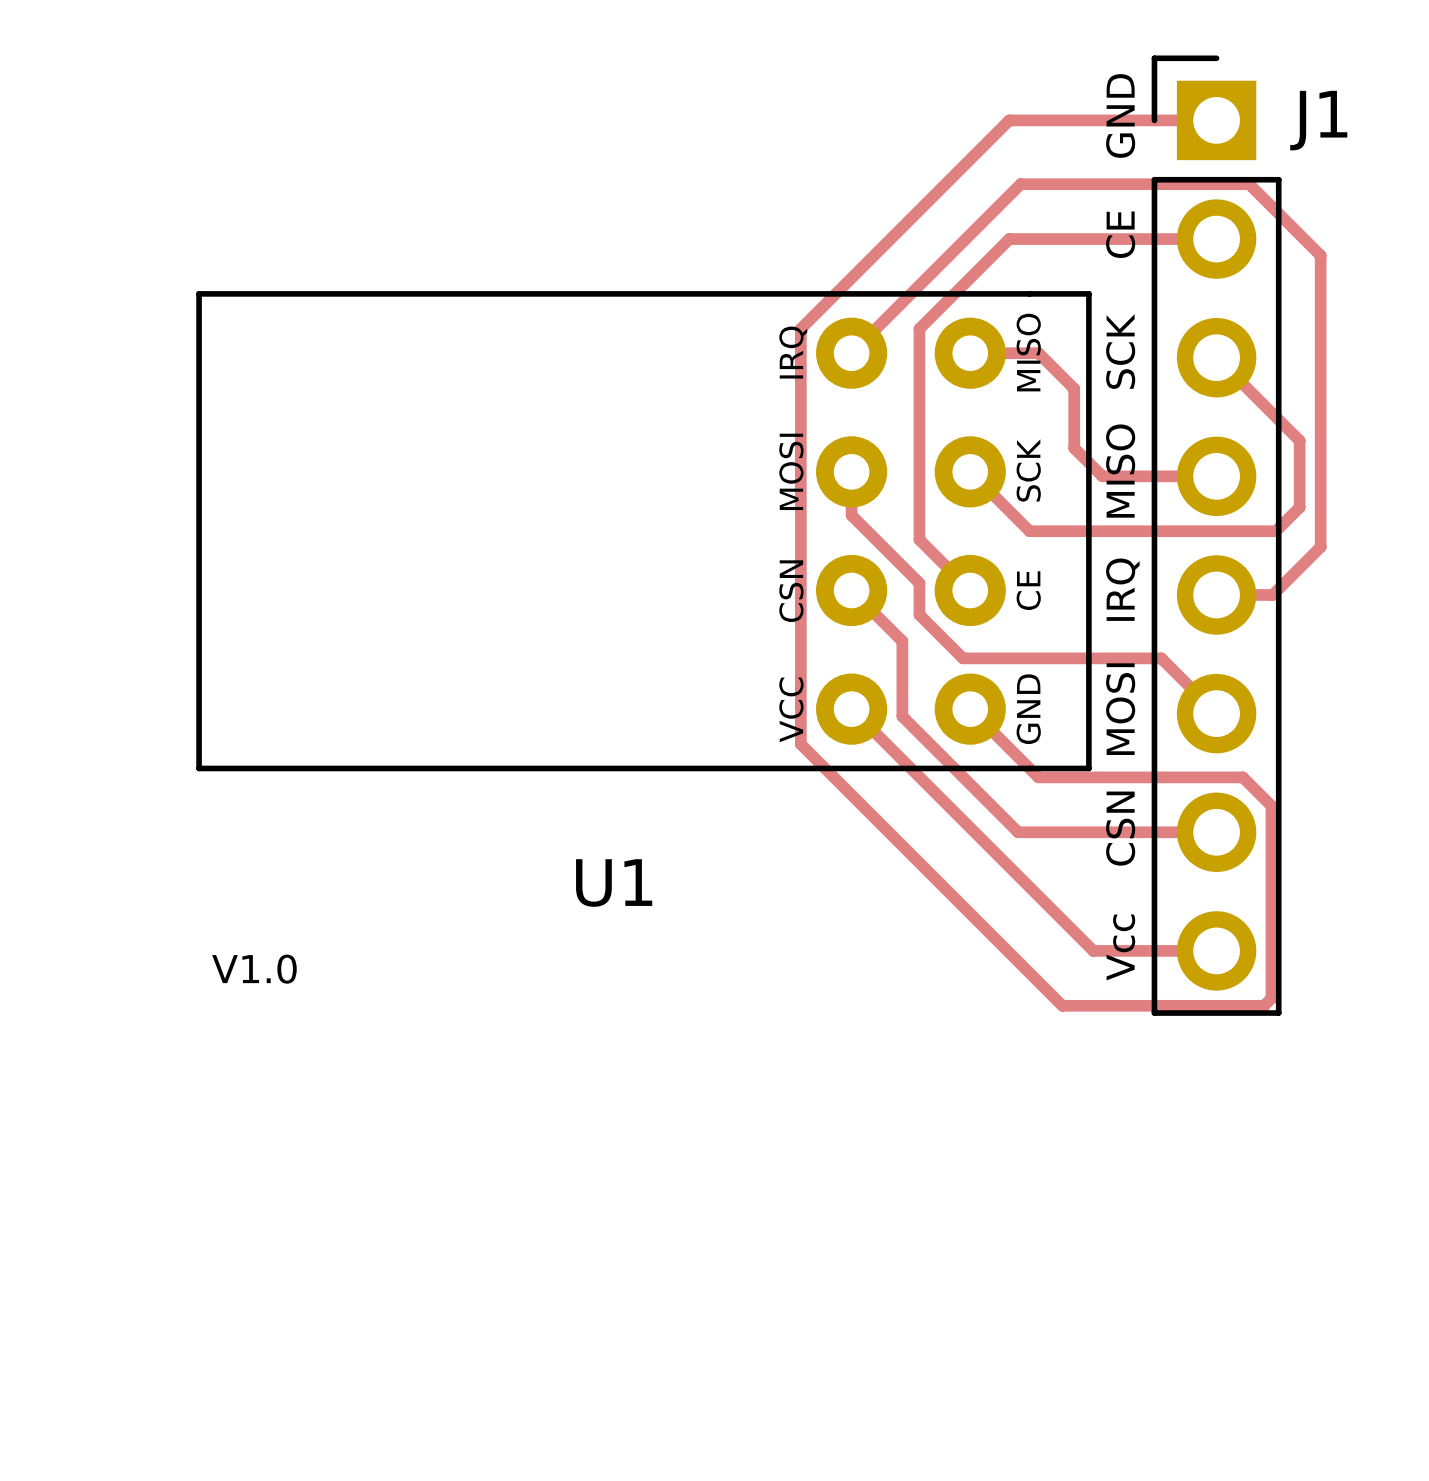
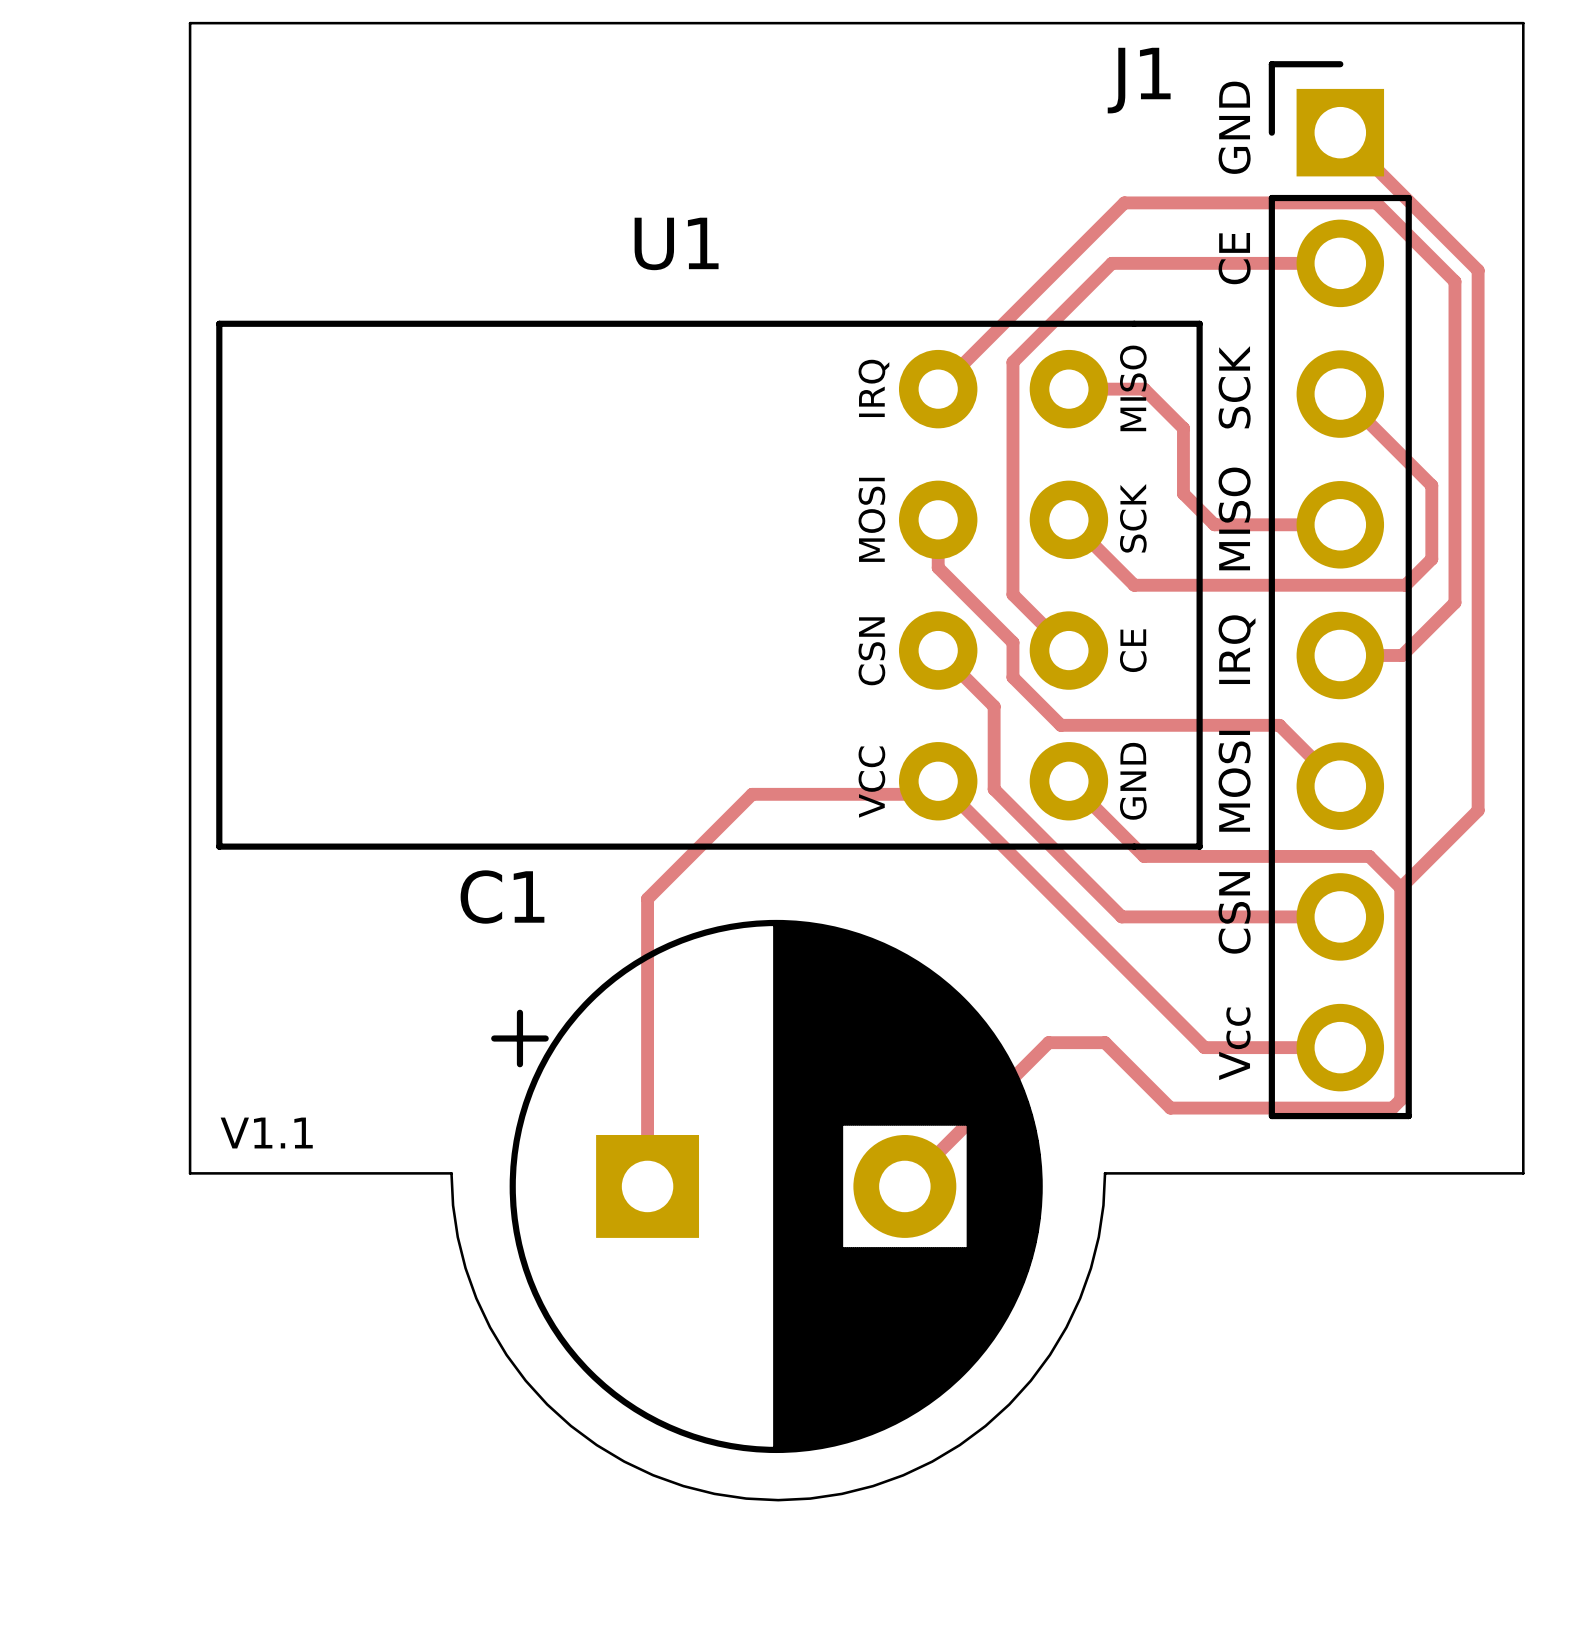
board edge: none -> (190, 23) (190, 1173) (451, 1173) (453, 1205) (457, 1237) (465, 1268) (476, 1298) (490, 1327) (506, 1354) (525, 1380) (547, 1404) (570, 1425) (596, 1445) (624, 1461) (653, 1475) (683, 1486) (714, 1493) (746, 1498) (778, 1500) (810, 1498) (842, 1493) (873, 1486) (903, 1475) (932, 1461) (959, 1445) (985, 1425) (1009, 1404) (1030, 1380) (1049, 1354) (1066, 1327) (1080, 1298) (1090, 1268) (1098, 1237) (1103, 1205) (1105, 1173) (1523, 1173) (1523, 23) (190, 23)
top track: (1216, 120) (1009, 120) (800, 328) (800, 744) (1003, 946) -> (1340, 132) (1478, 270) (1478, 810) (1400, 887)
J1 name position: J1 (1318, 120) -> J1 (1139, 80)
top track: none -> (938, 781) (925, 794) (752, 794) (647, 898) (647, 1186)
U1 name position: U1 (614, 883) -> U1 (676, 243)
top track: none -> (1105, 1042) (1048, 1042) (904, 1186)
text: V1.0 (254, 969) -> none
text: none -> V1.1 (266, 1133)
C1: none -> (766, 1186)

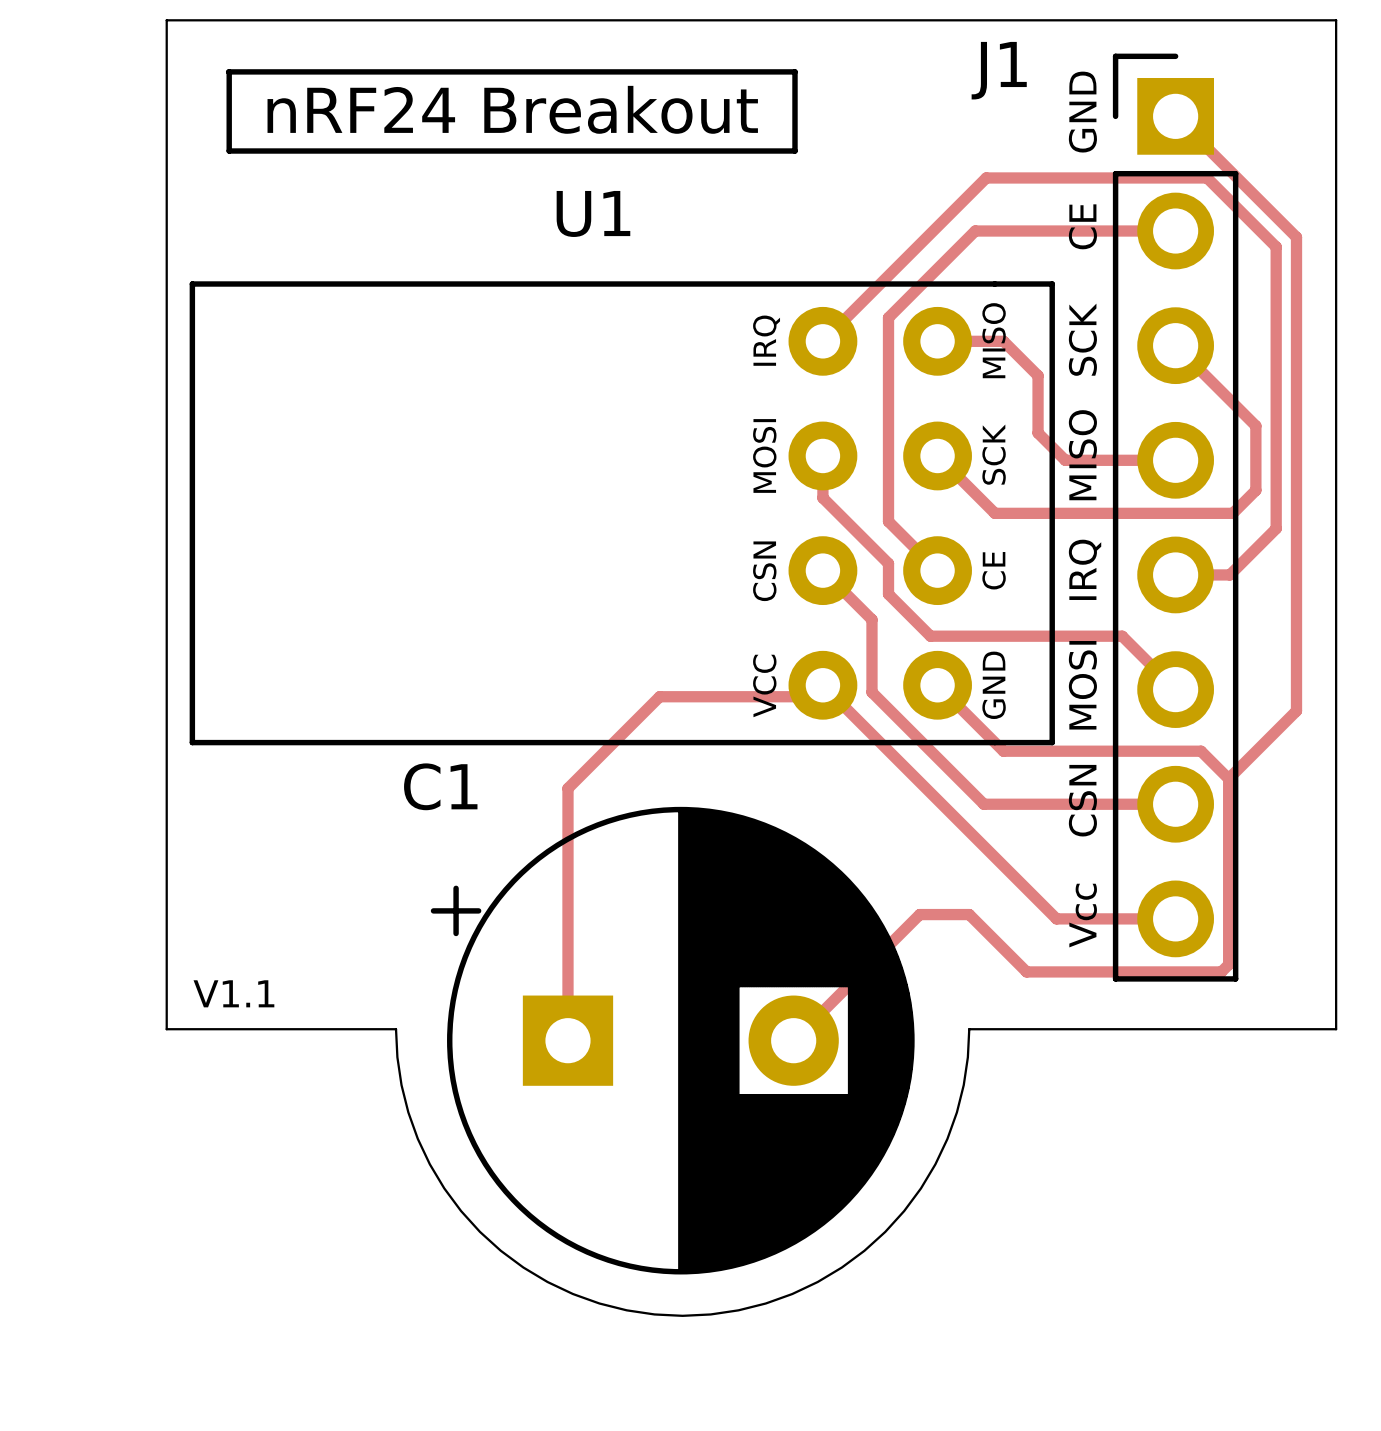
line: none -> (228, 71) (794, 71) (794, 151) (229, 151) (229, 71)
text: none -> nRF24 Breakout (512, 109)

